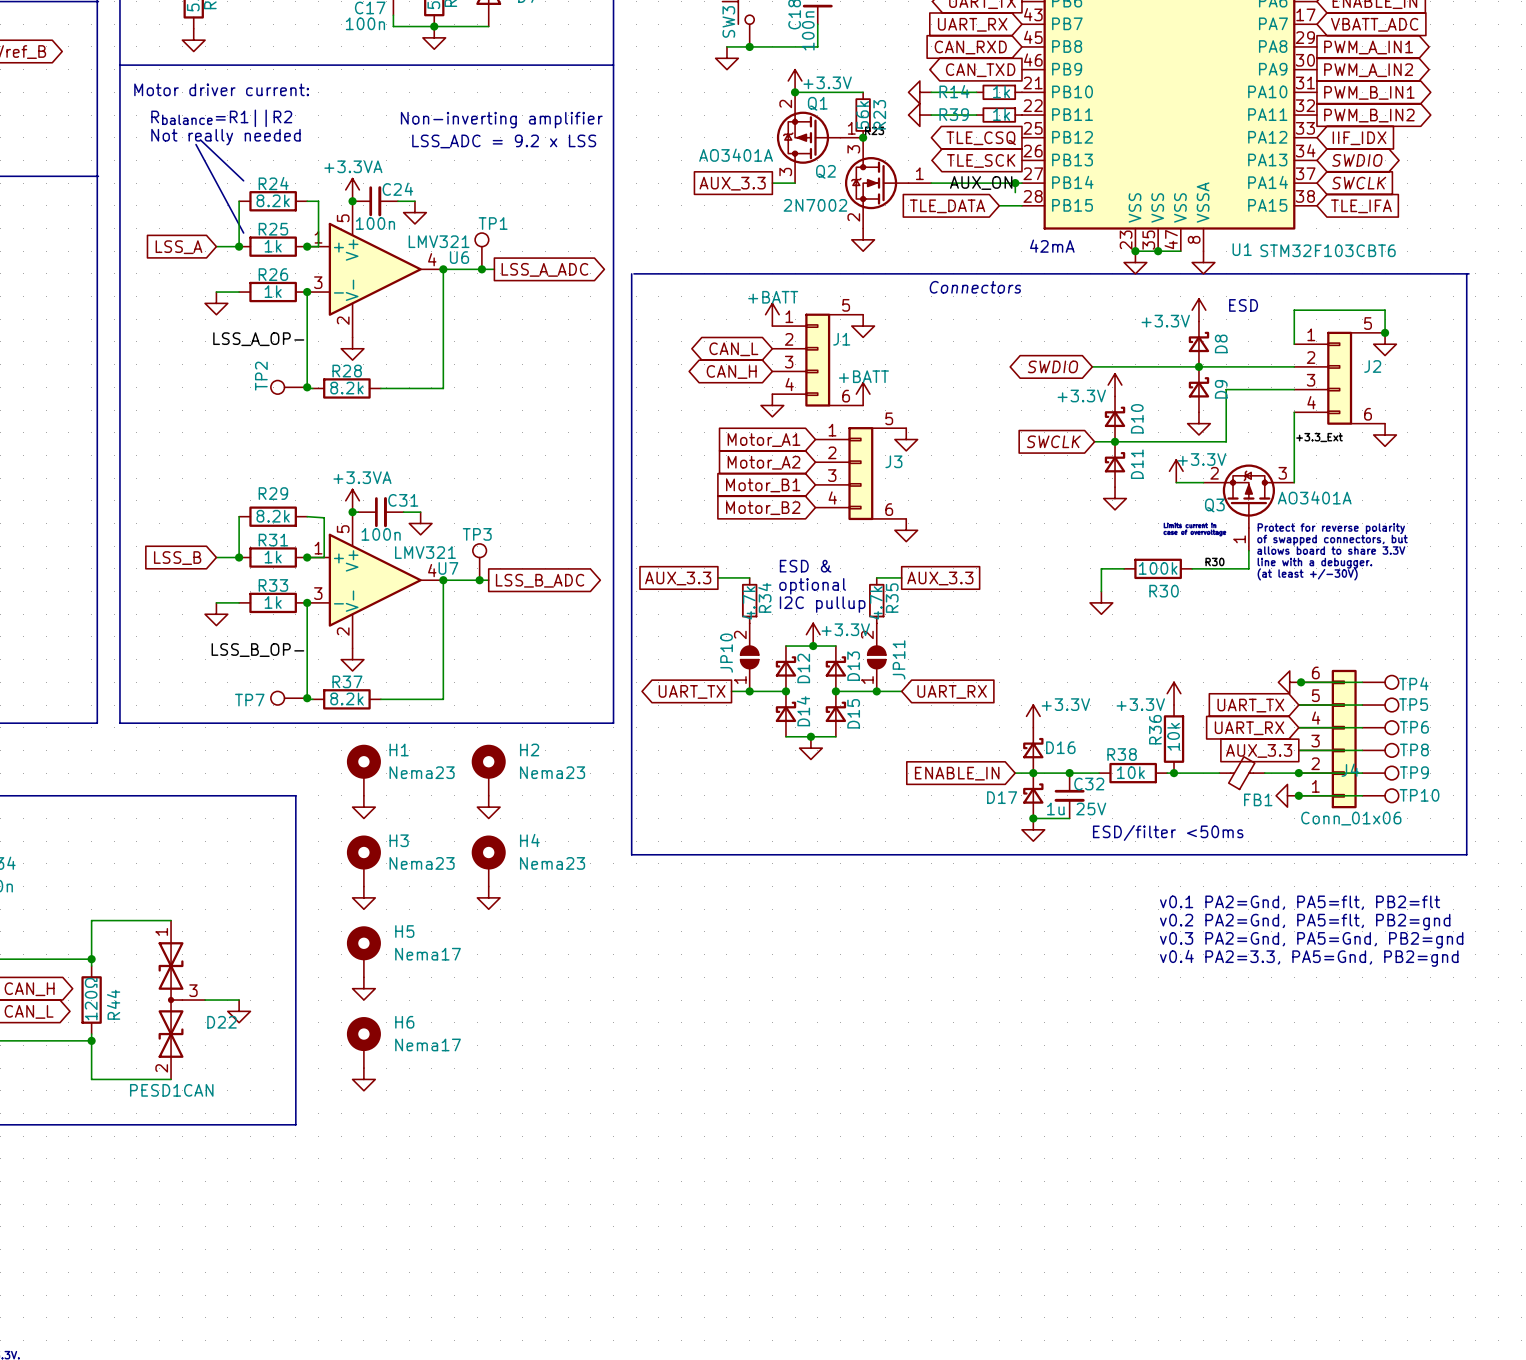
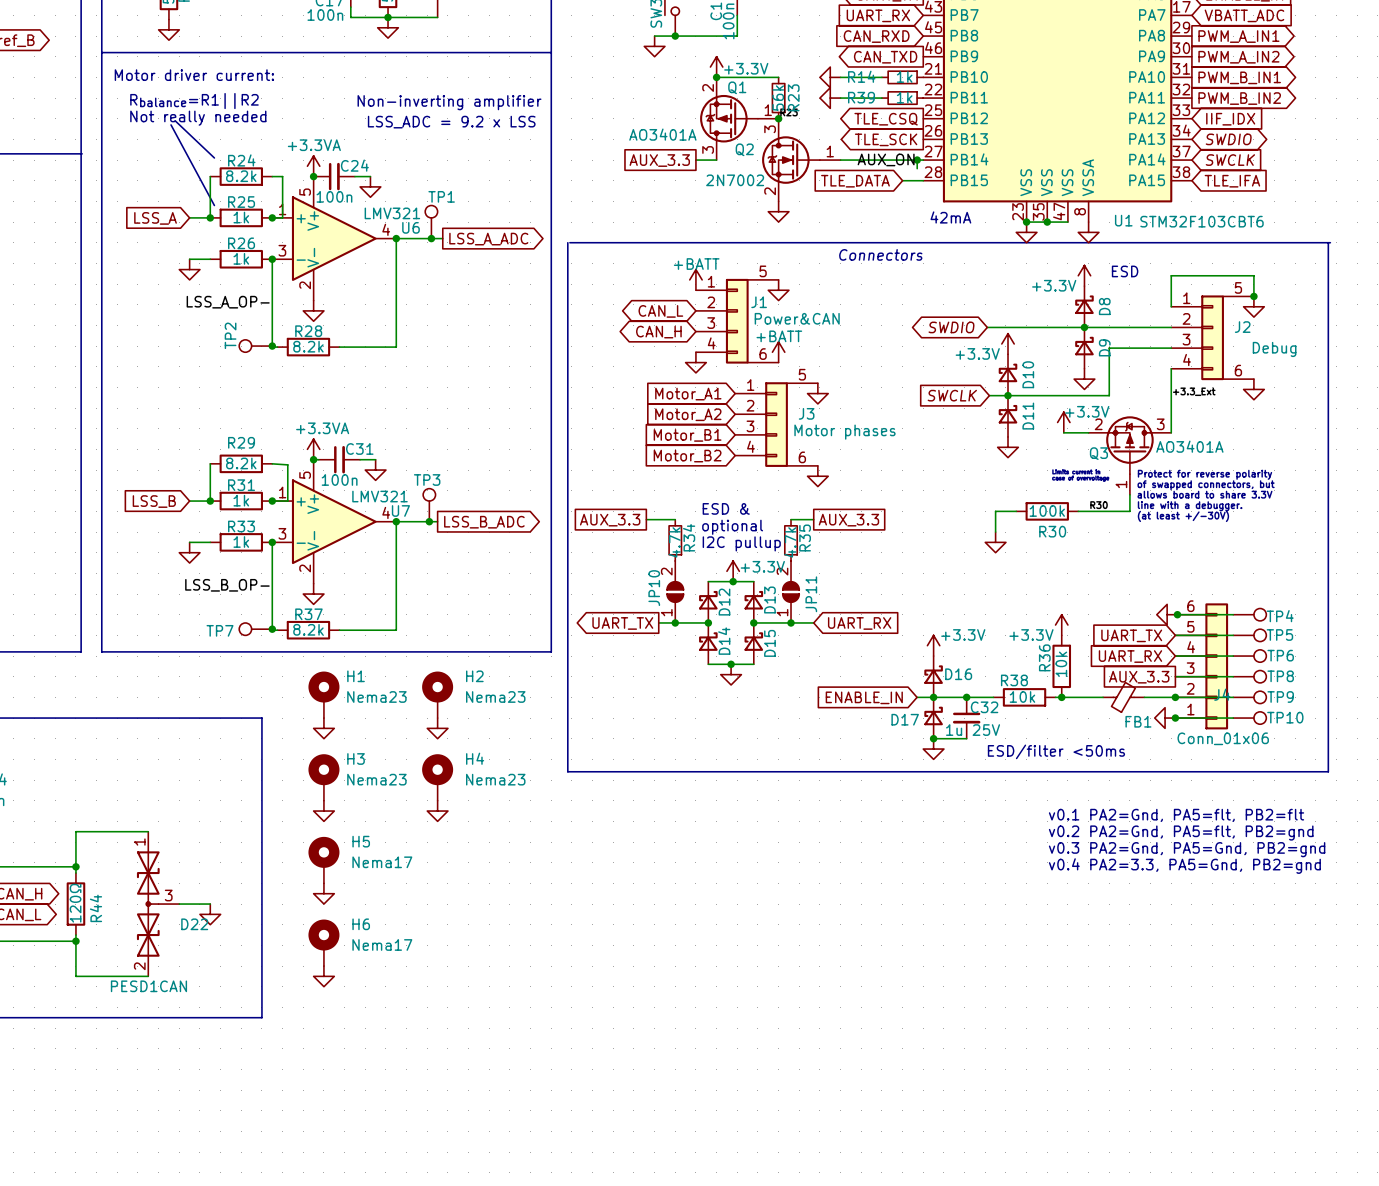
J1 text: none -> Power&CAN (797, 318)
J2 text: none -> Debug (1274, 349)
J3 text: none -> Motor phases (844, 432)

